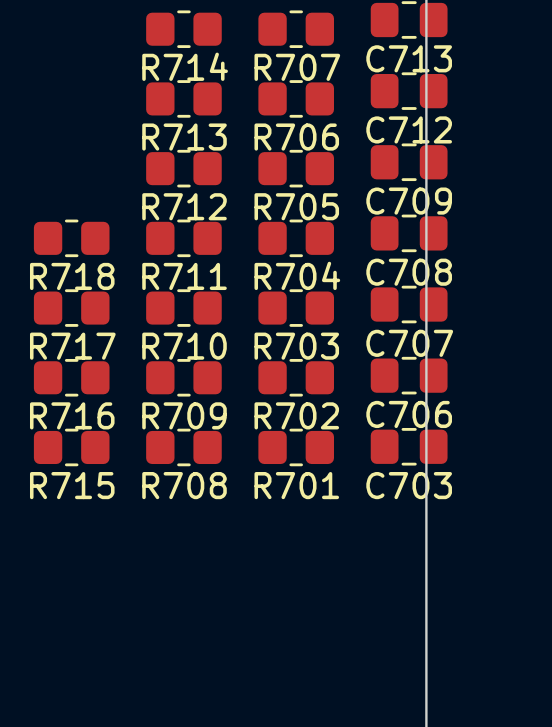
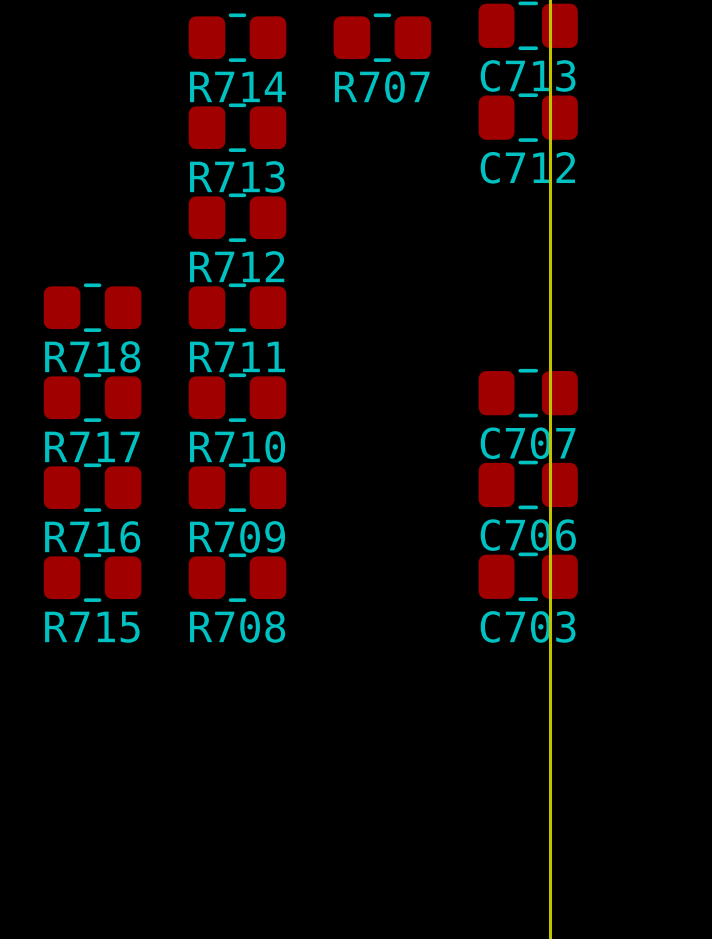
R706: (296, 98) -> none
C709: (409, 162) -> none
R705: (296, 168) -> none
C708: (409, 233) -> none
R704: (296, 238) -> none
R703: (296, 308) -> none
R702: (296, 377) -> none
R701: (296, 447) -> none

